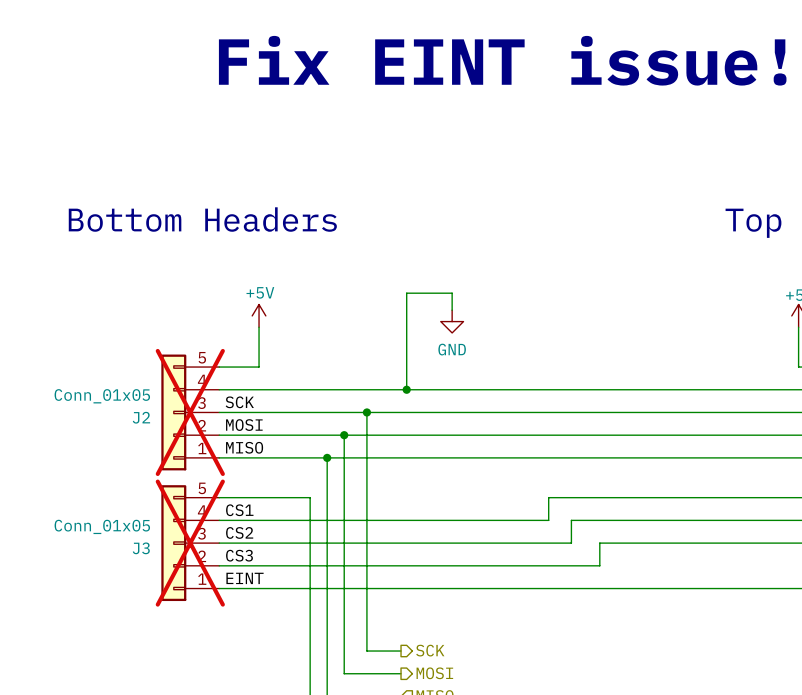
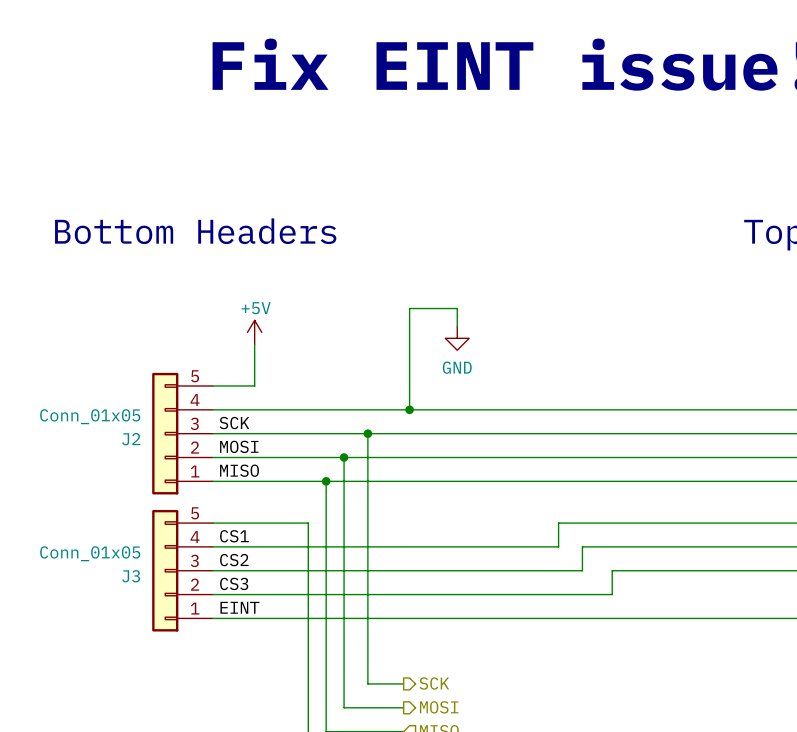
J2 do-not-place cross: (190, 412) -> none
J3 do-not-place cross: (190, 543) -> none

